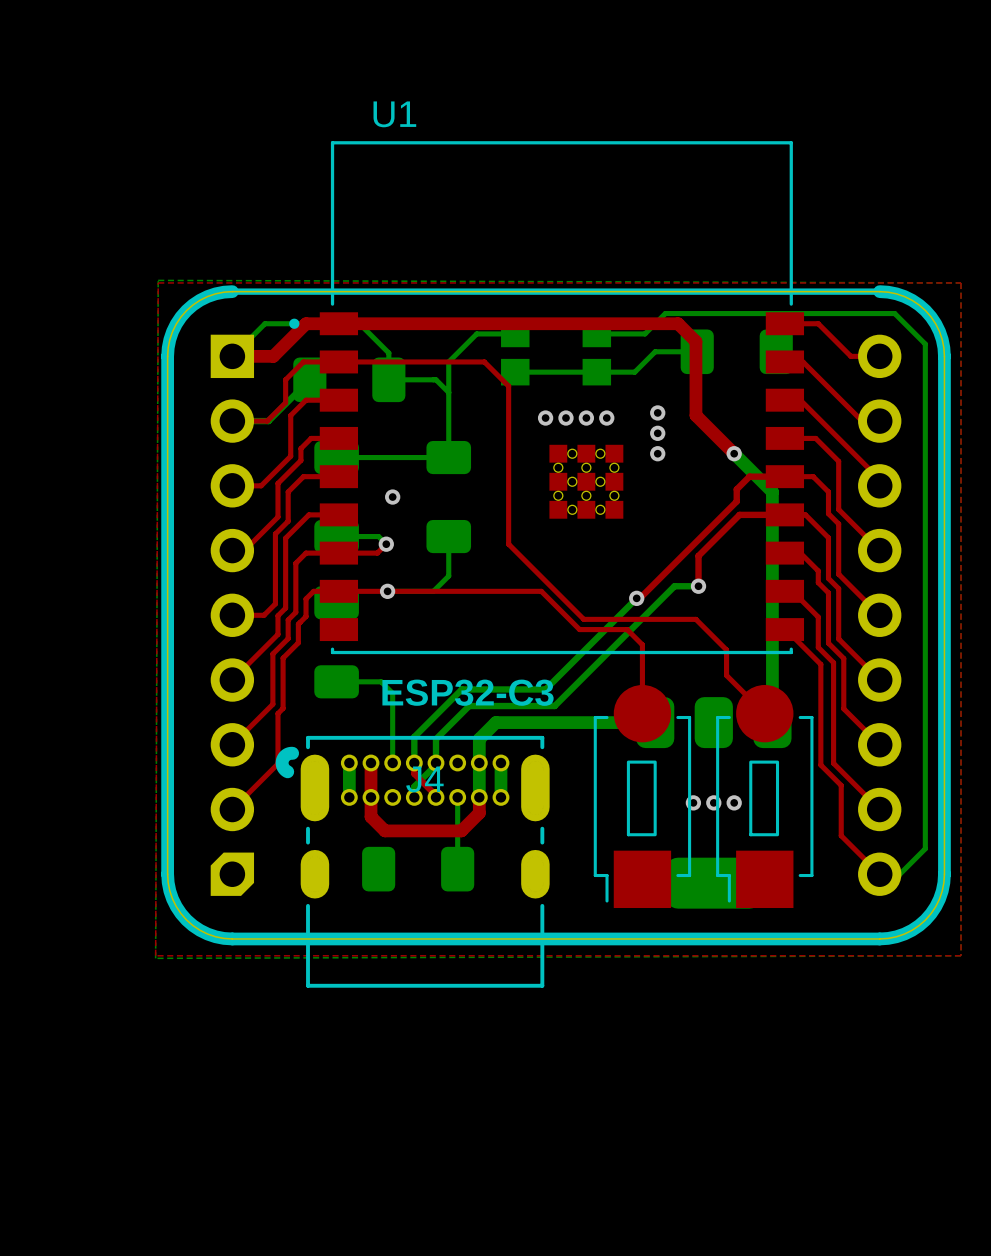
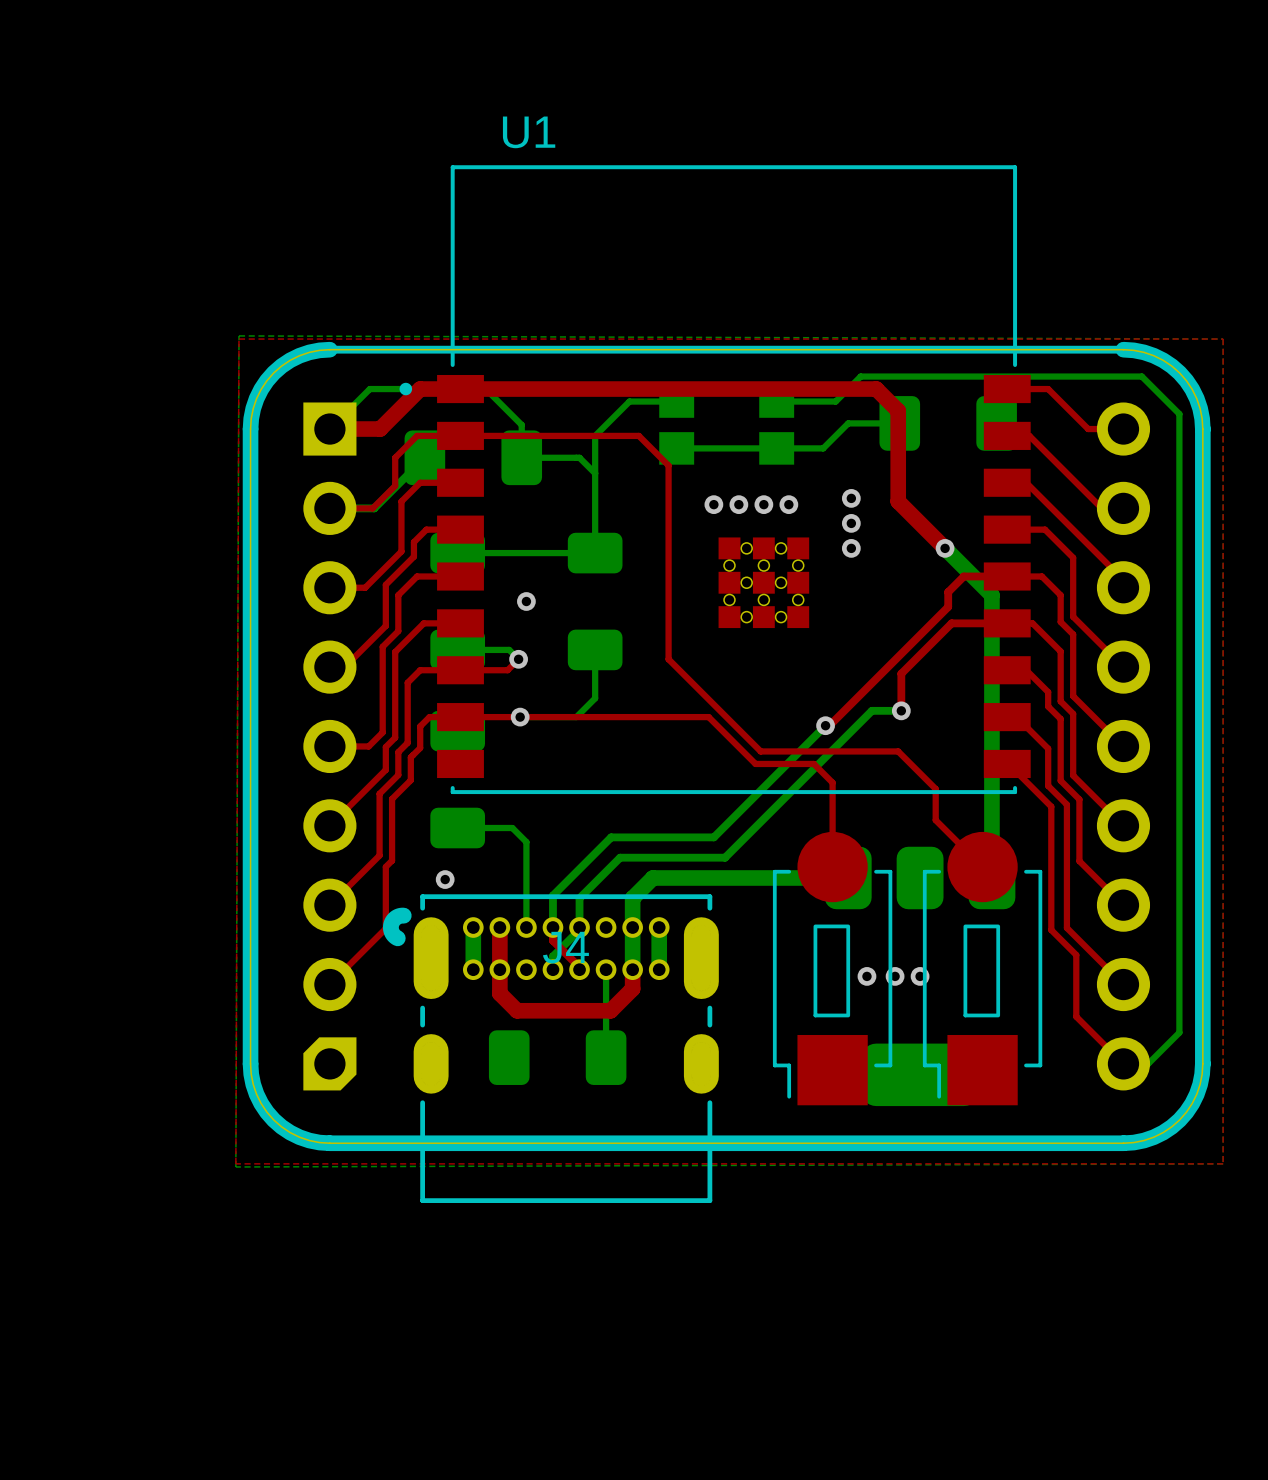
text: ESP32-C3 (468, 692) -> none
via: none -> (445, 879)
via position: (734, 802) -> (866, 976)

